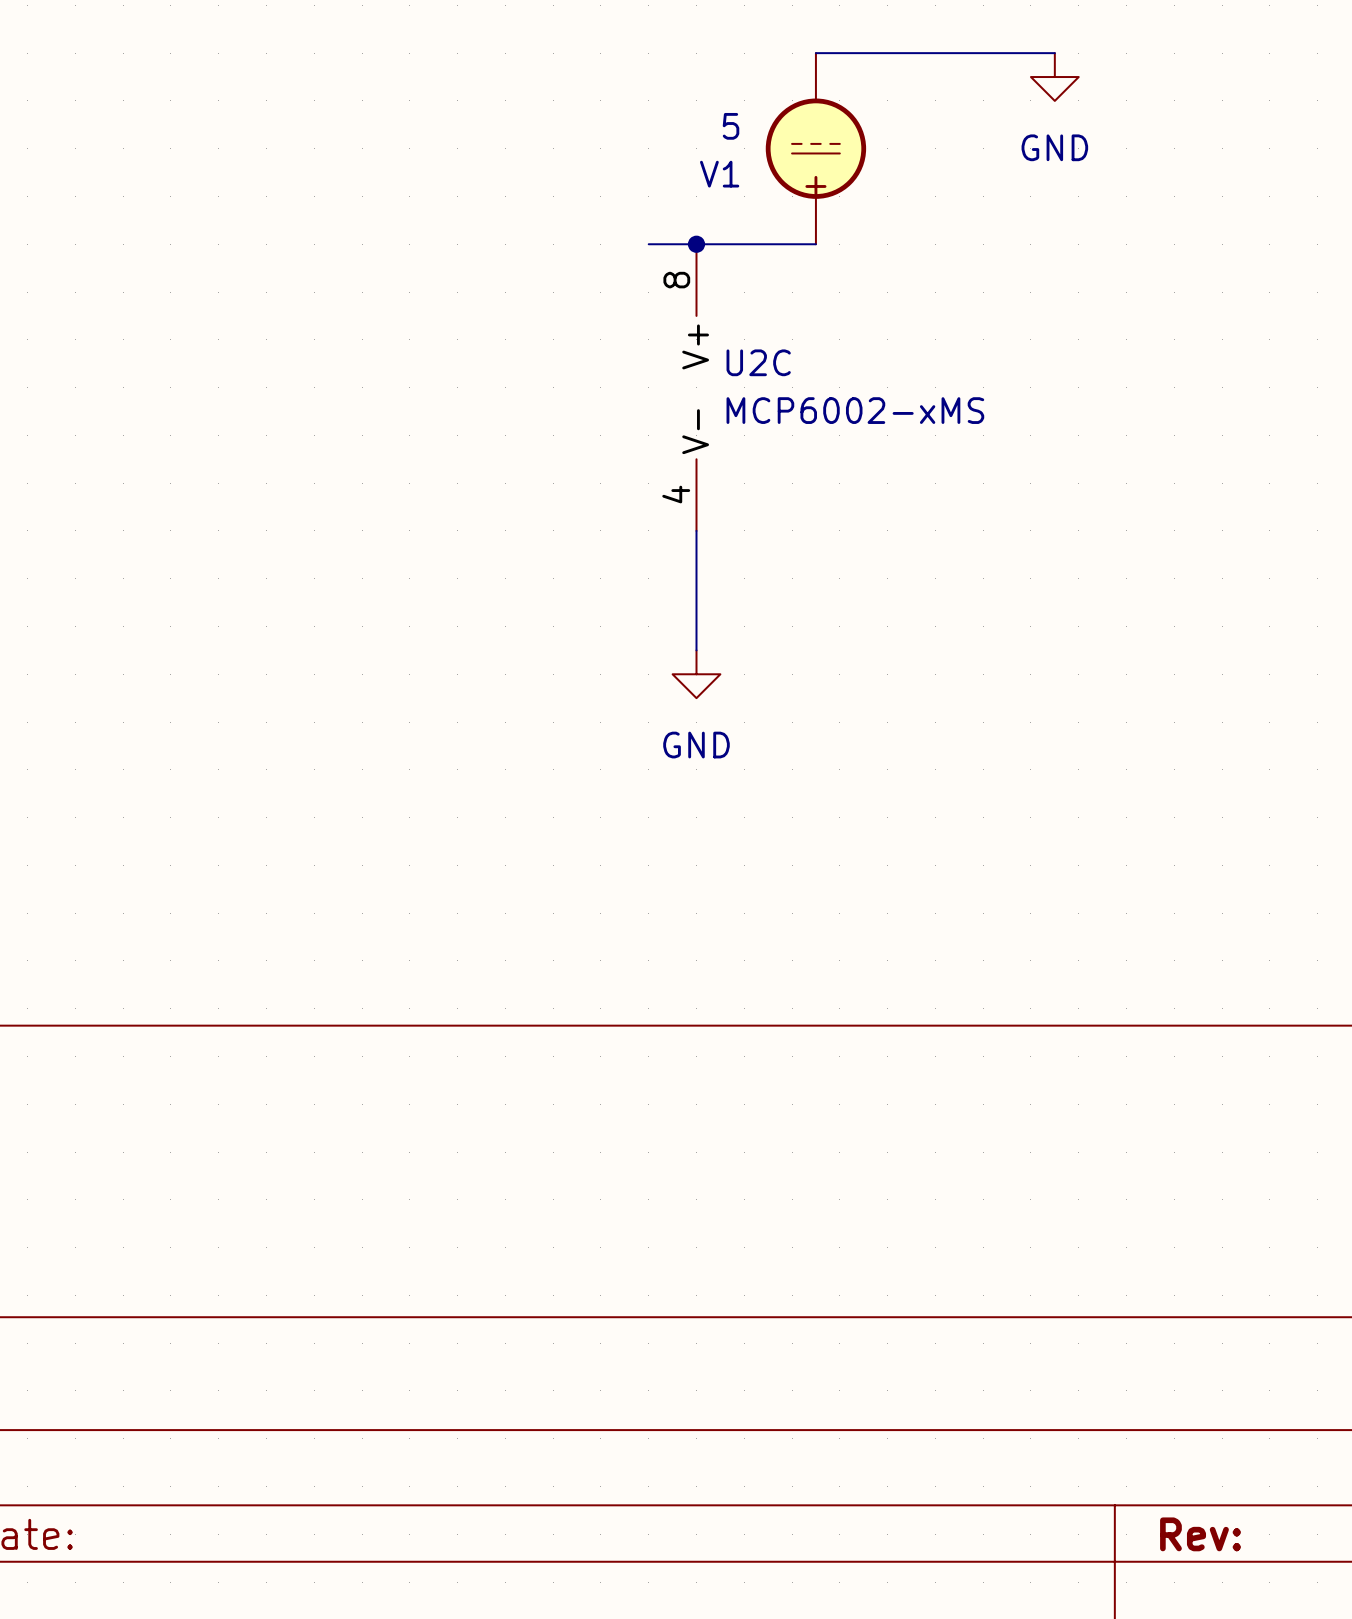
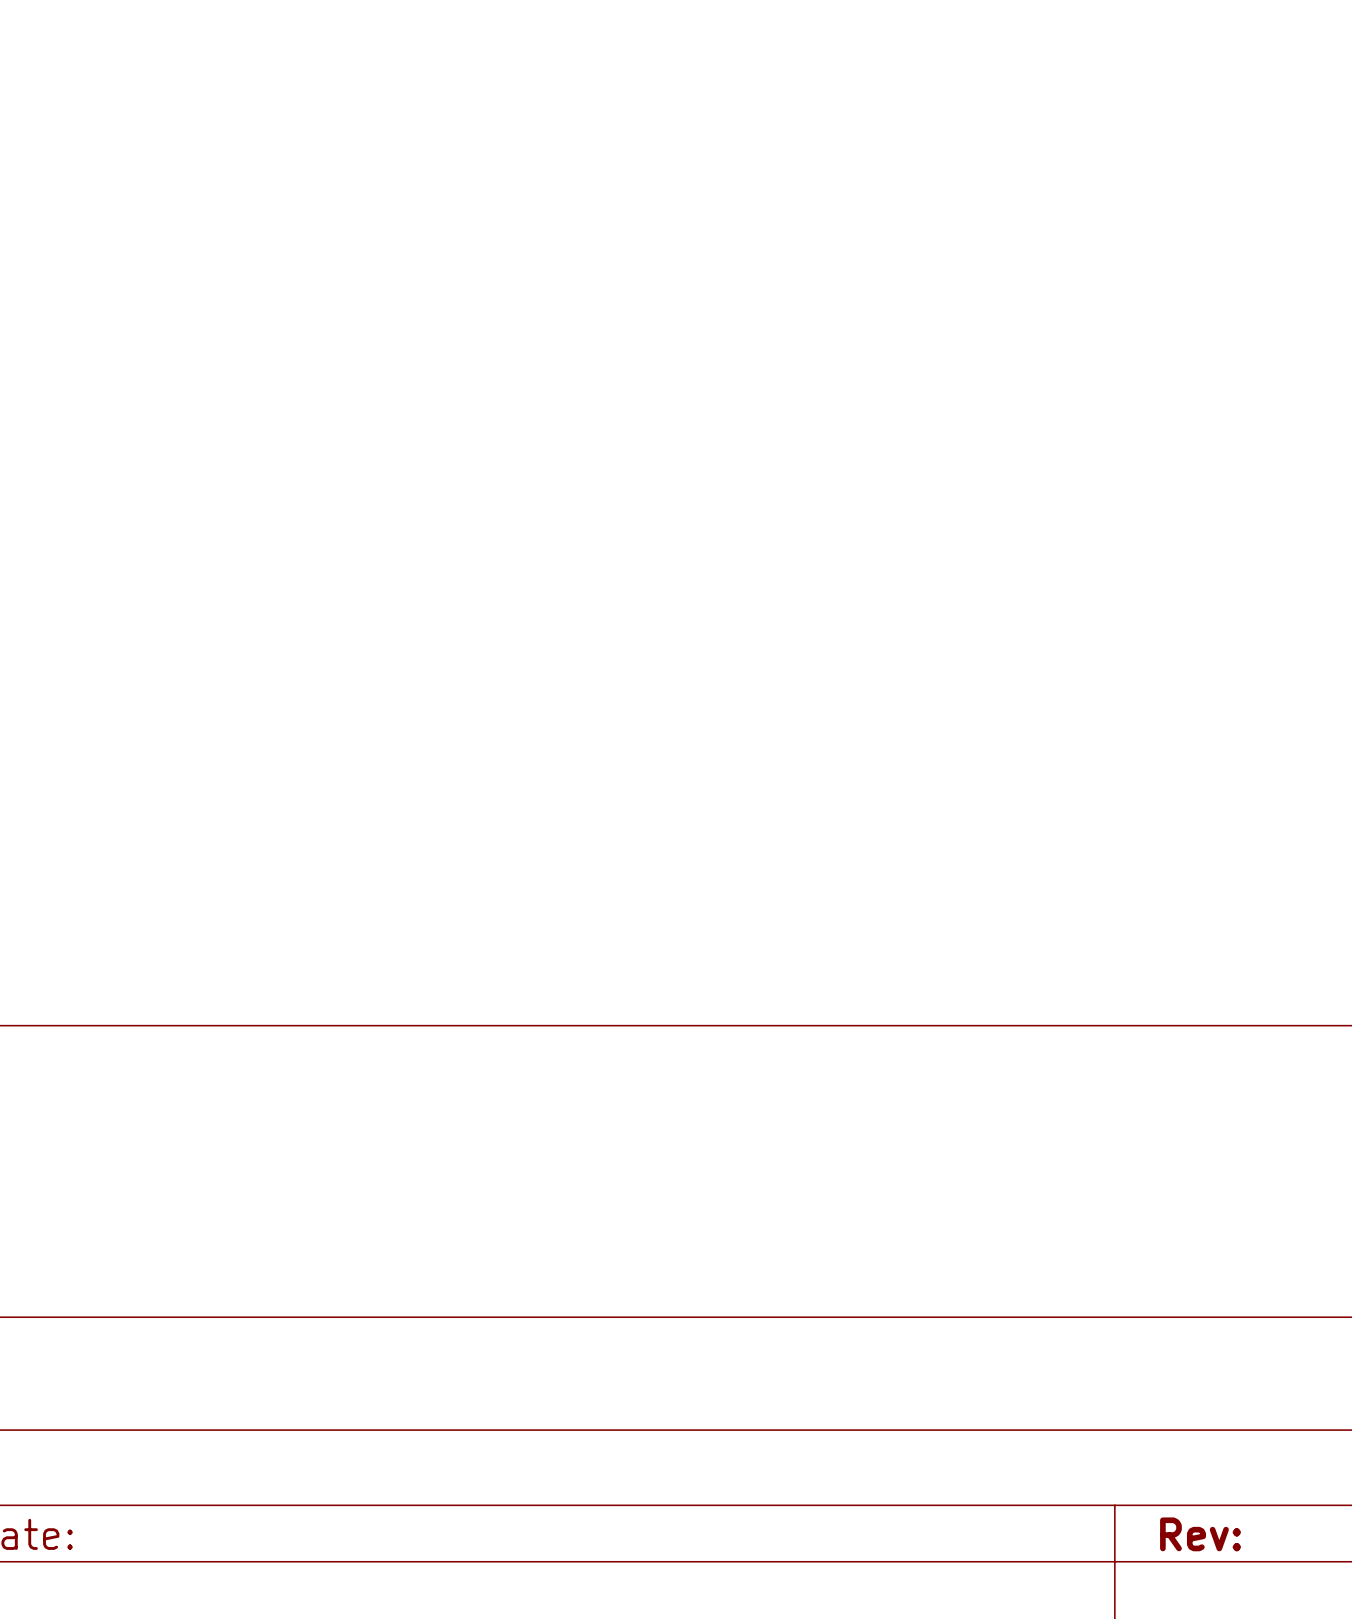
wire: (815, 53) (1054, 53) -> none
power symbol: GND (1054, 77) -> none
V1: 5 (815, 148) -> none
wire: (648, 244) (815, 244) -> none
junction: (696, 244) -> none
U2C: MCP6002-xMS (696, 387) -> none
wire: (696, 530) (696, 650) -> none
power symbol: GND (696, 674) -> none

